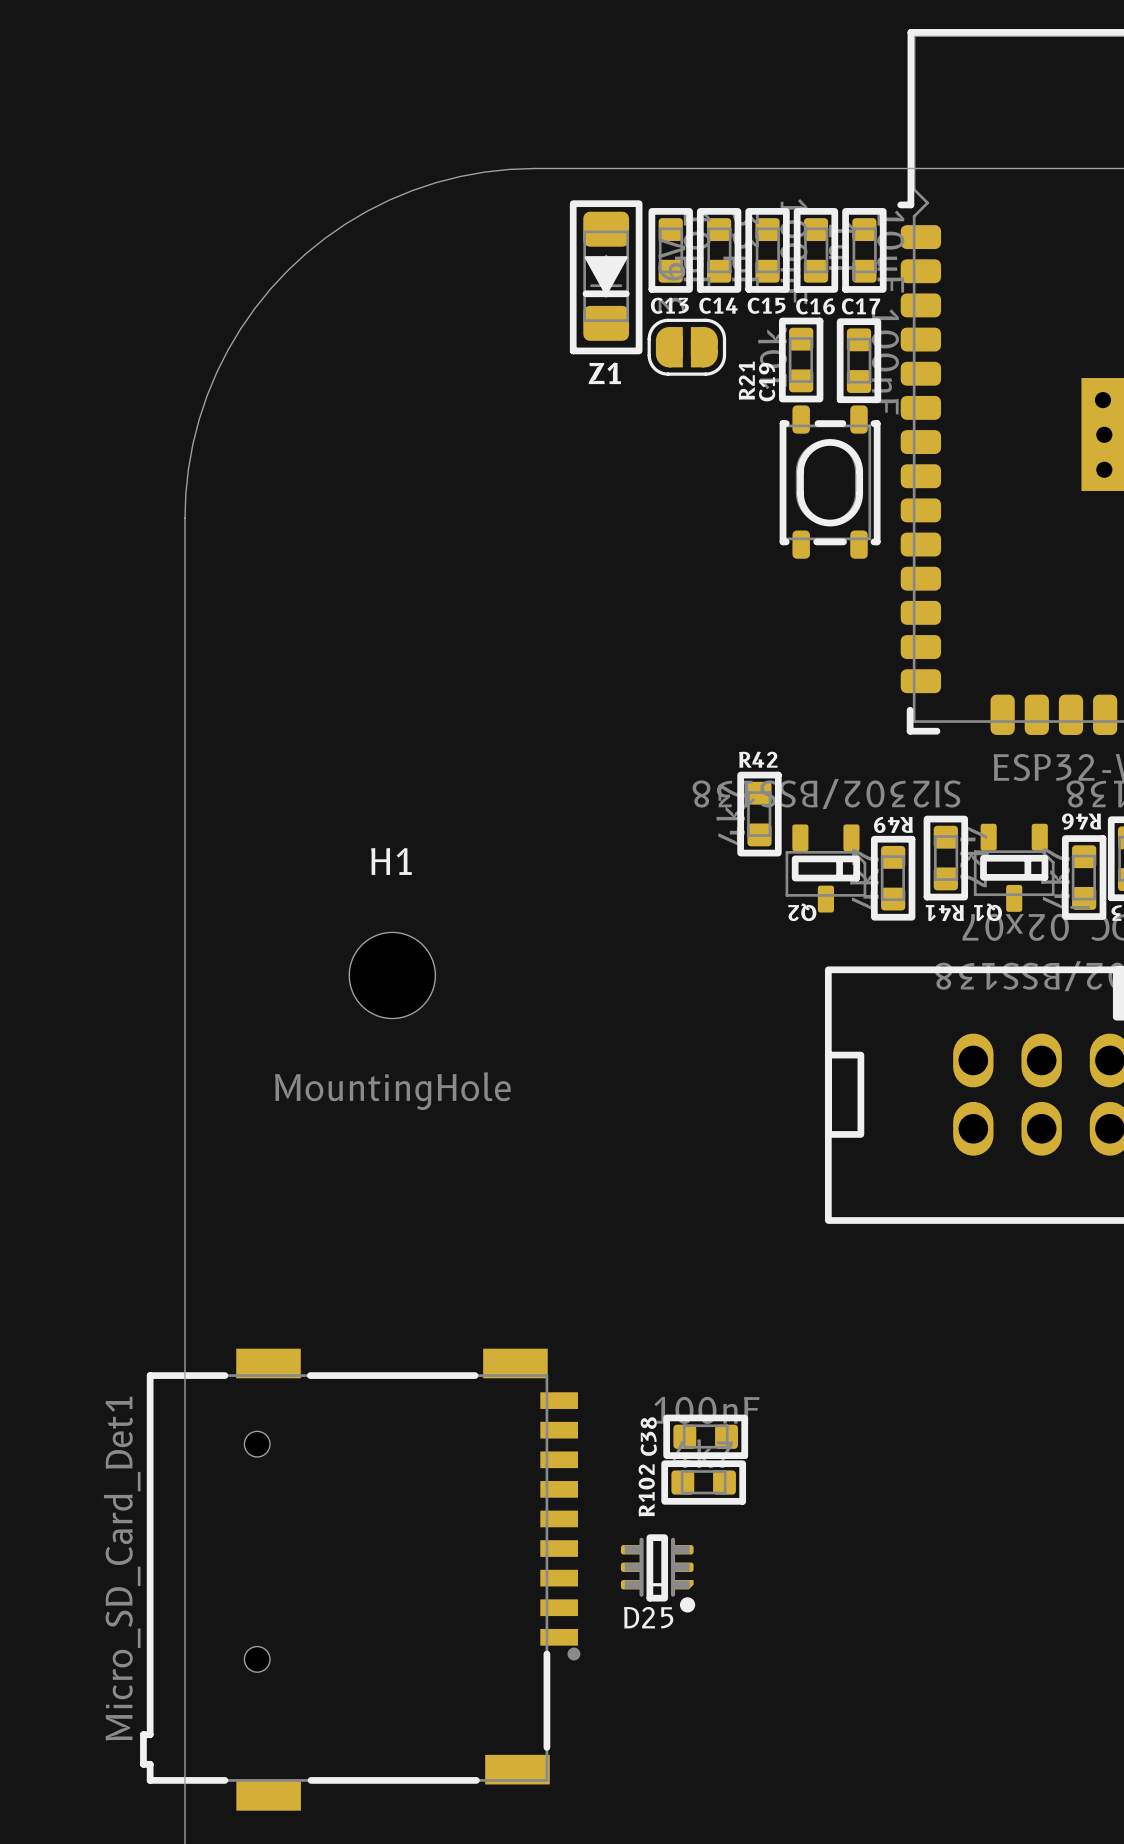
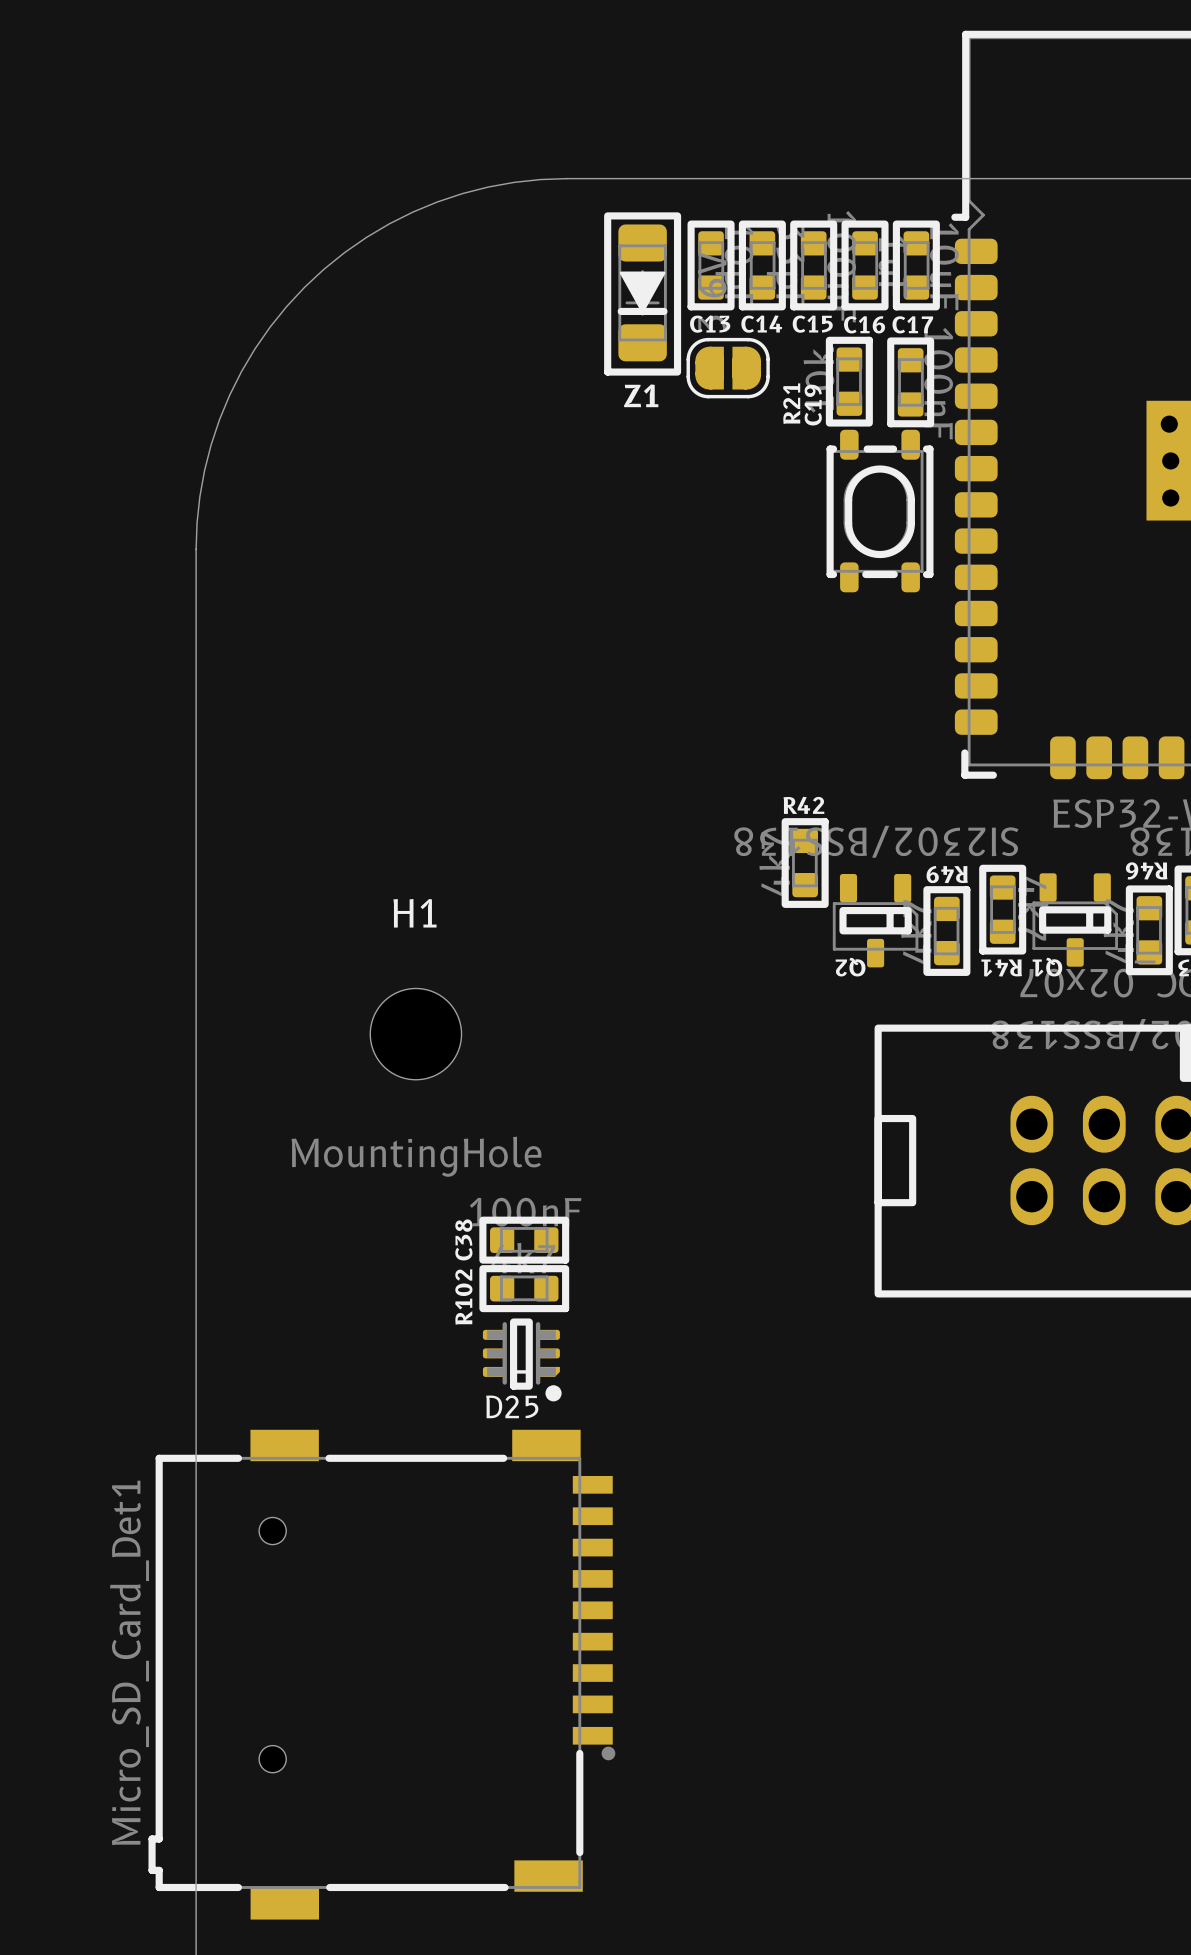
C38 position: (705, 1436) -> (524, 1240)
R102 position: (703, 1482) -> (524, 1288)
D25 position: (658, 1573) -> (522, 1359)

